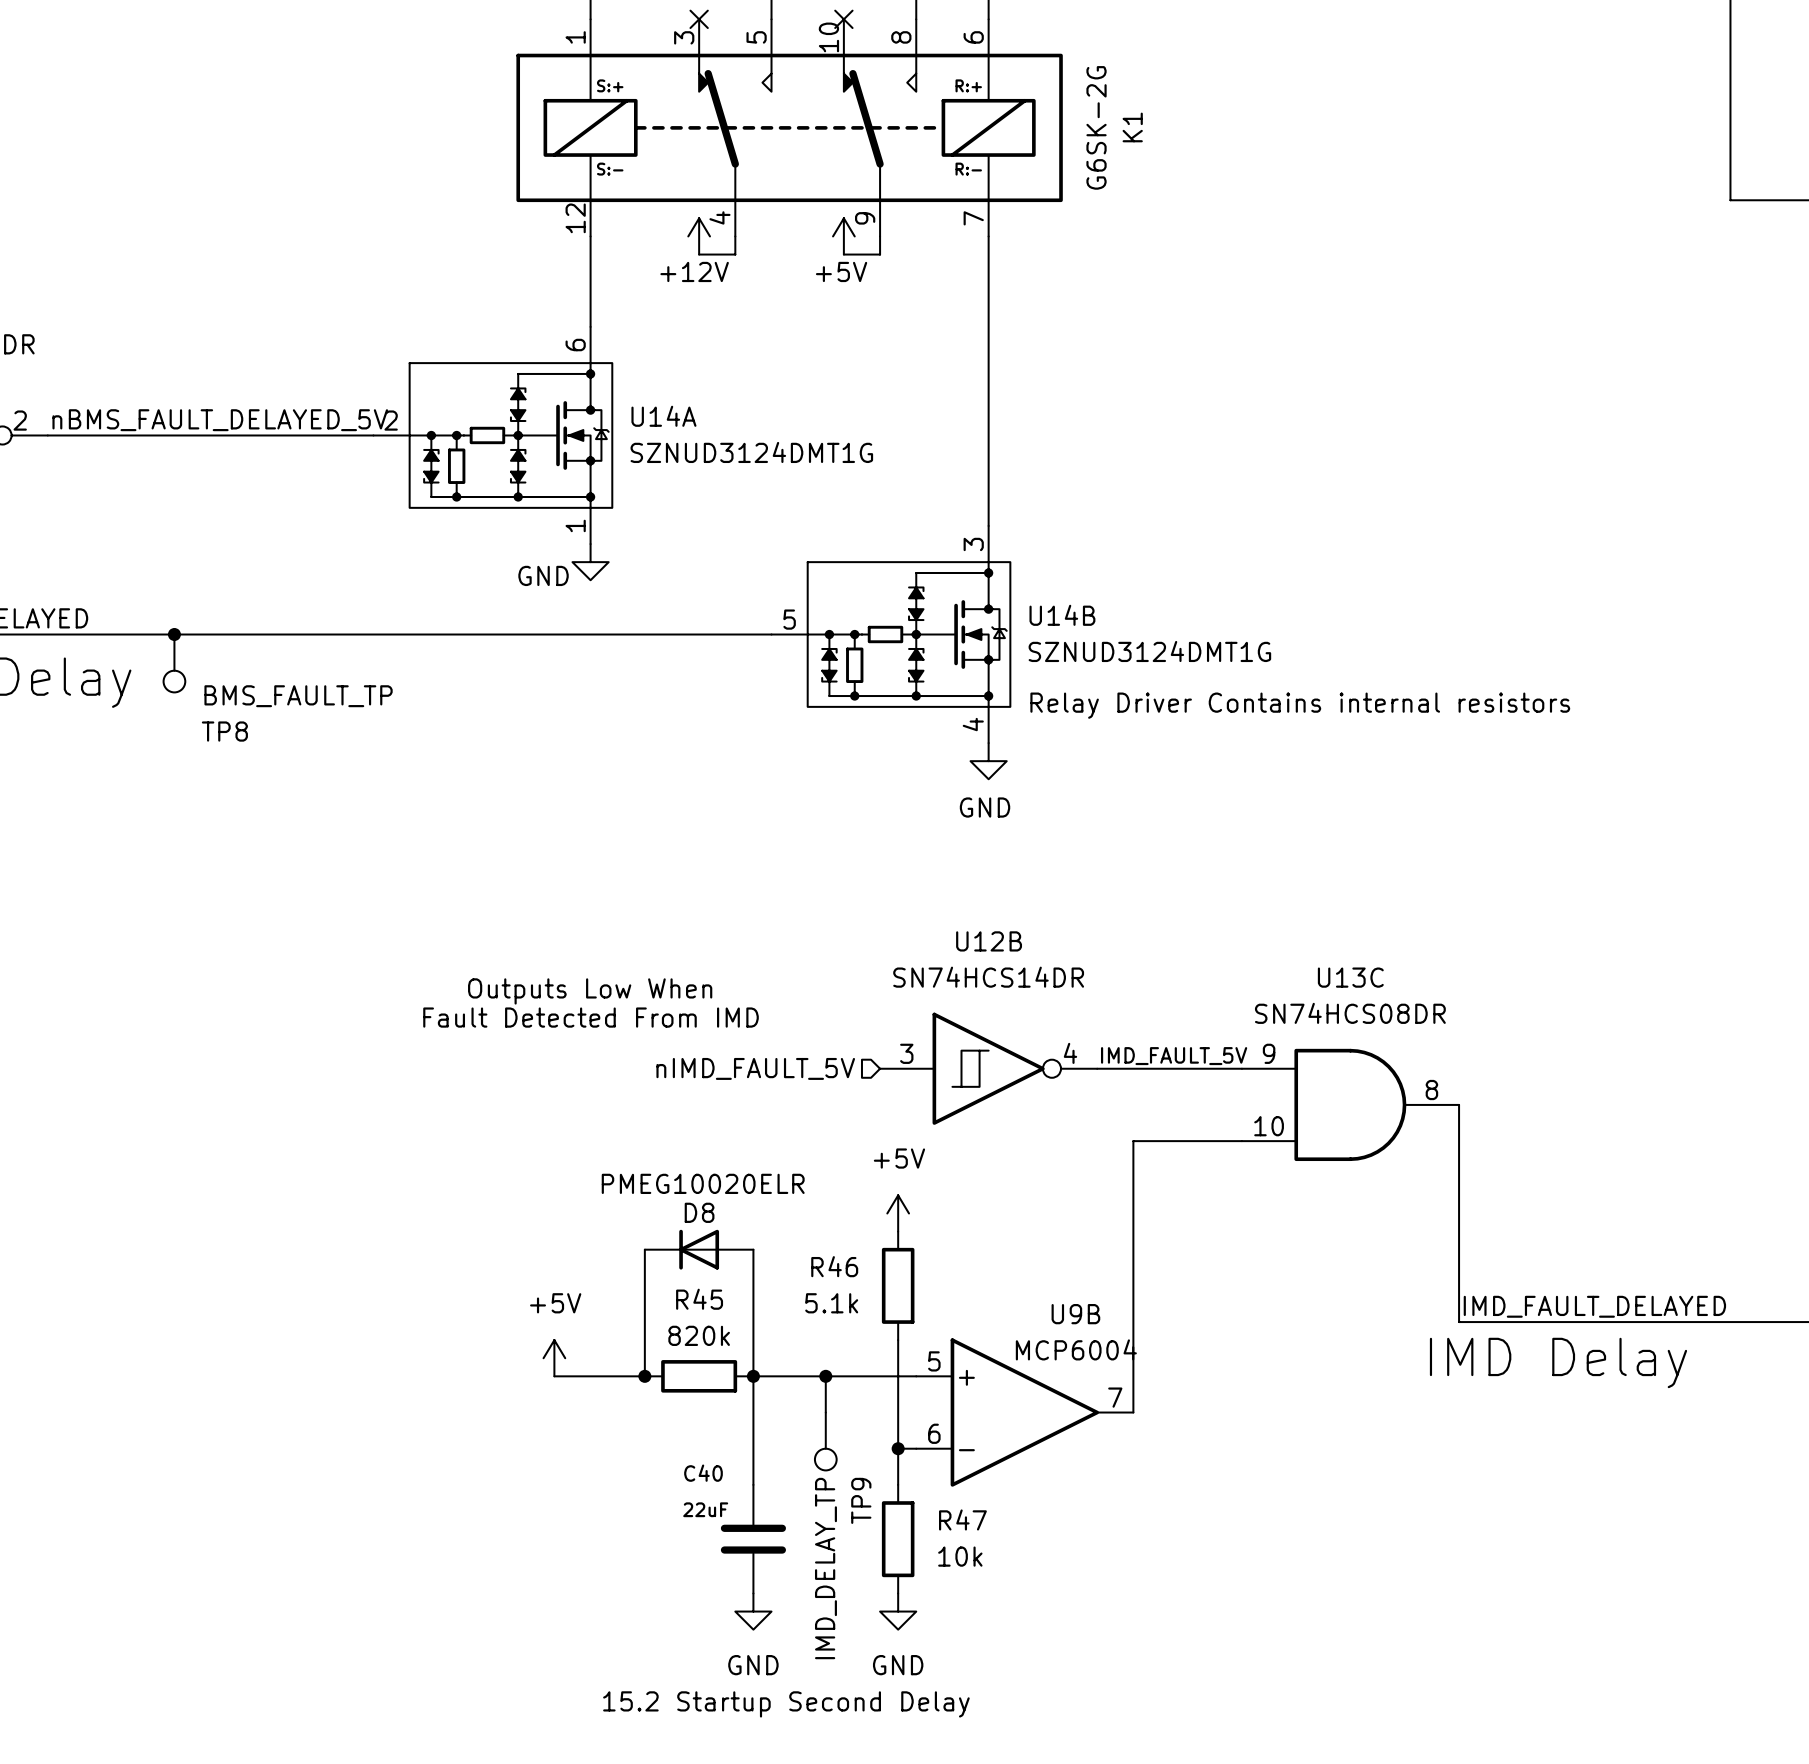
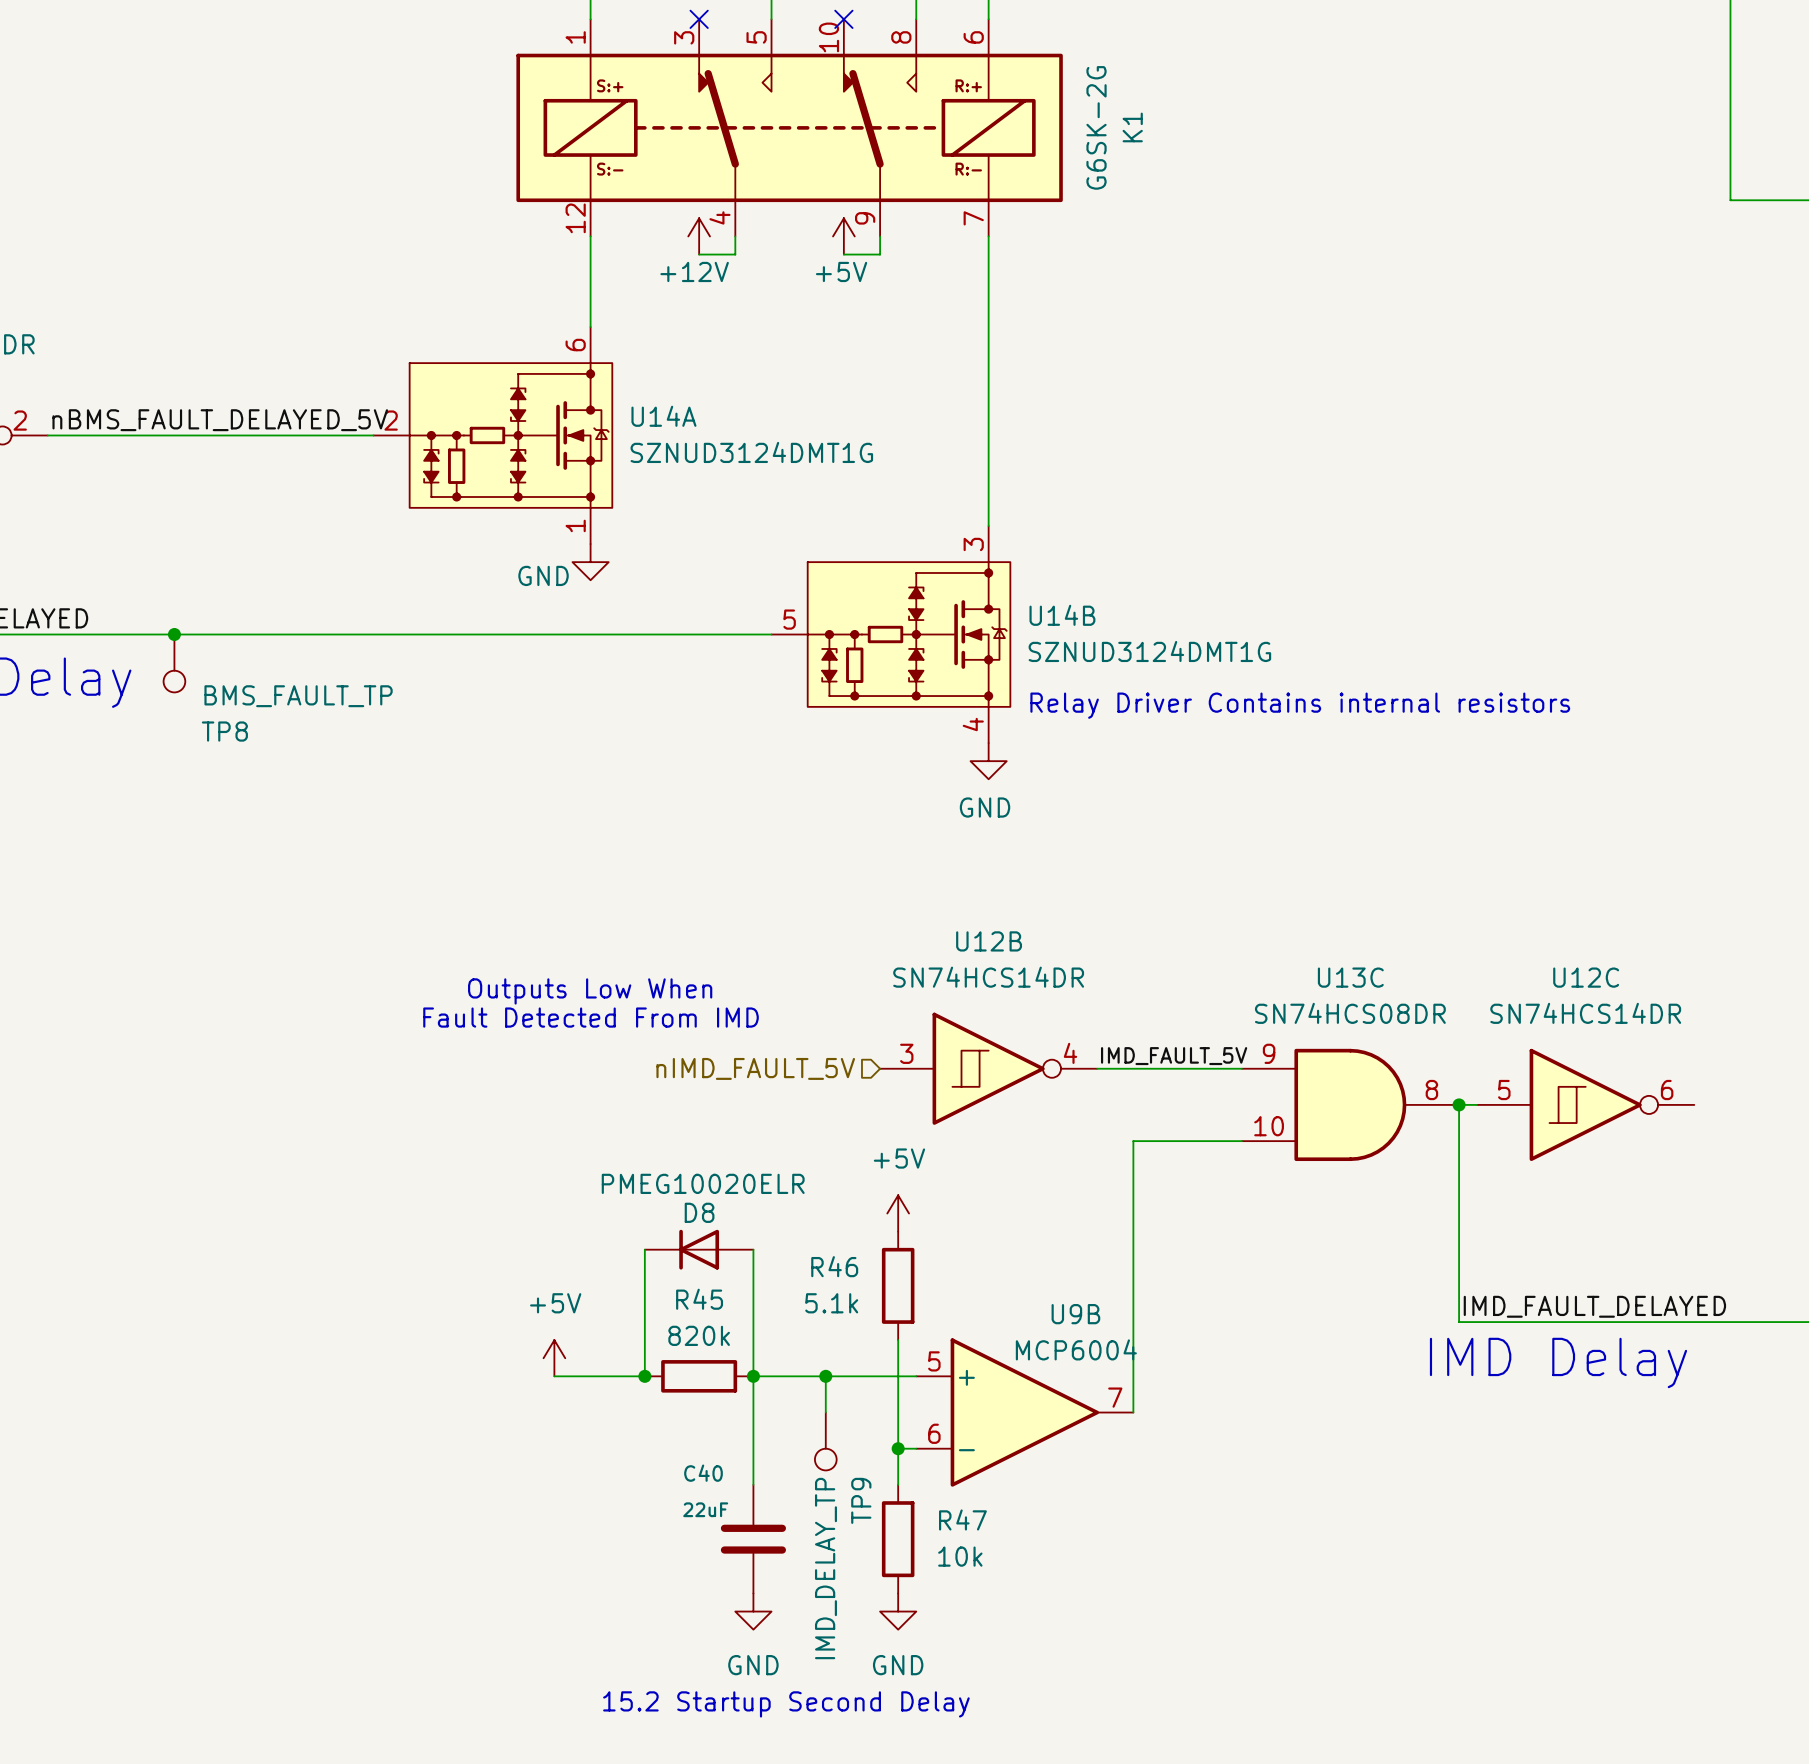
wire: none -> (1459, 1104) (1477, 1104)
junction: none -> (1459, 1104)
U12C: none -> SN74HCS14DR (1585, 1104)

